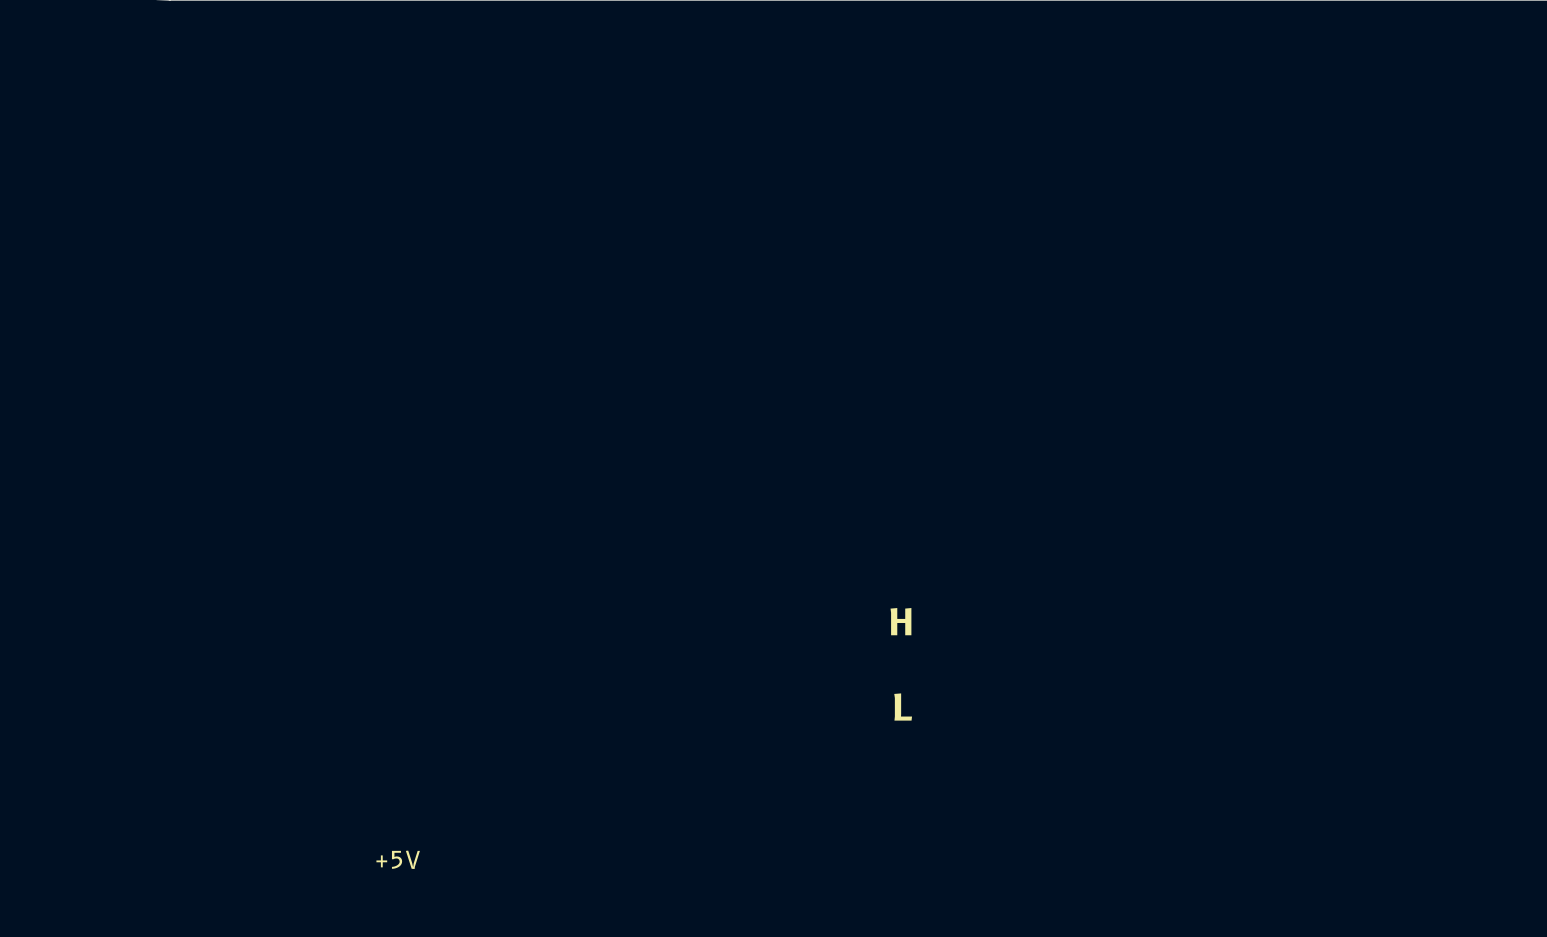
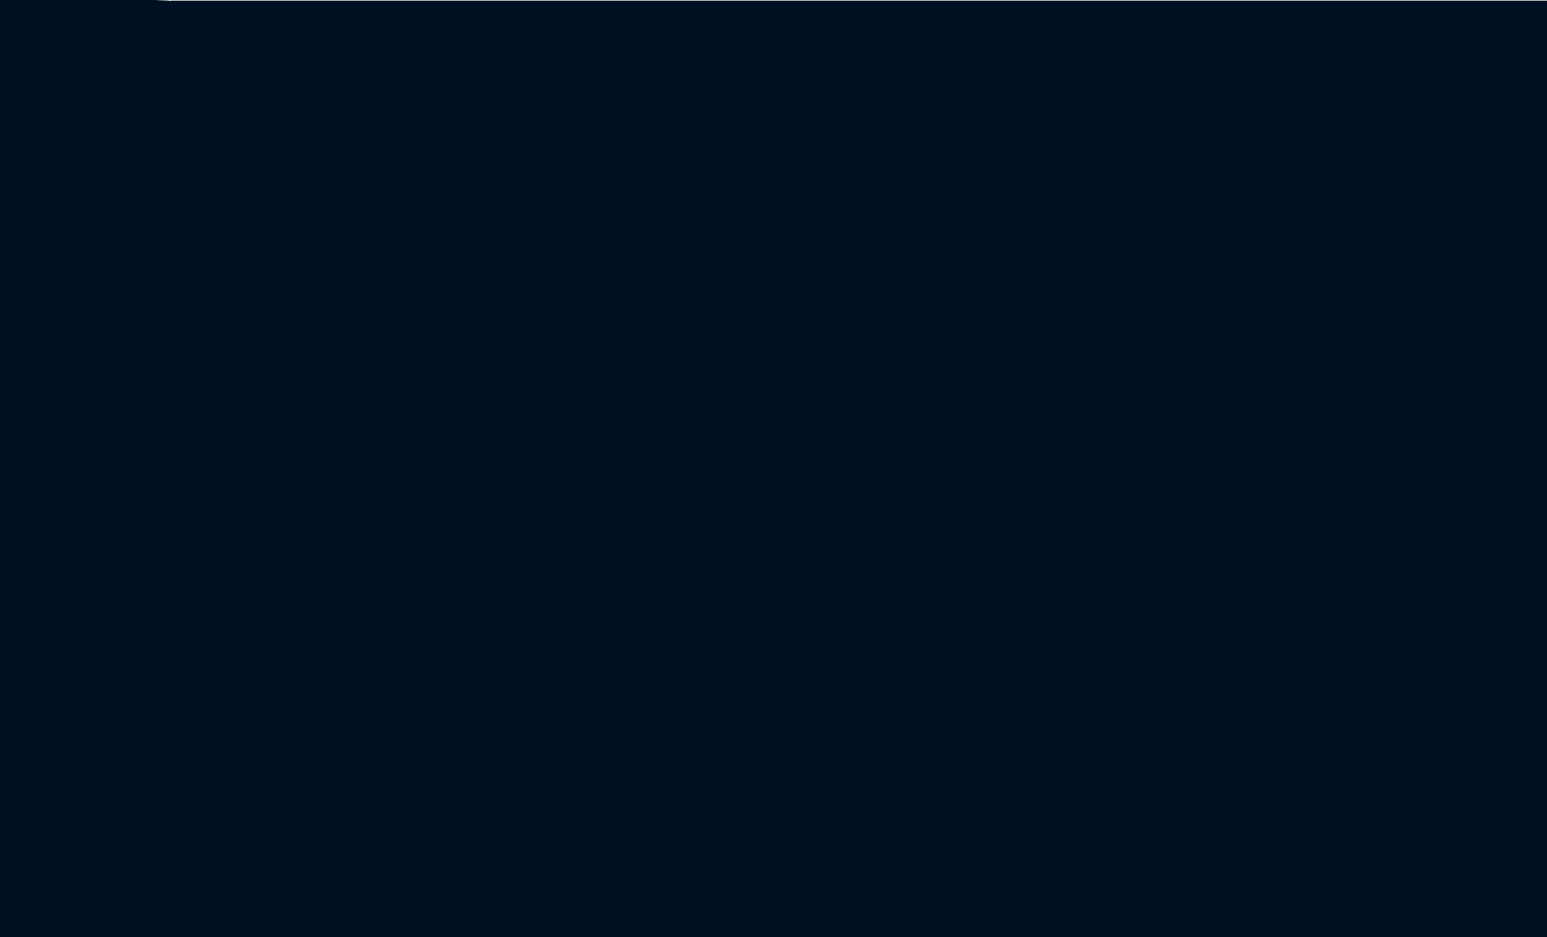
text: H (900, 621) -> none
text: L (903, 707) -> none
text: +5V (398, 859) -> none

